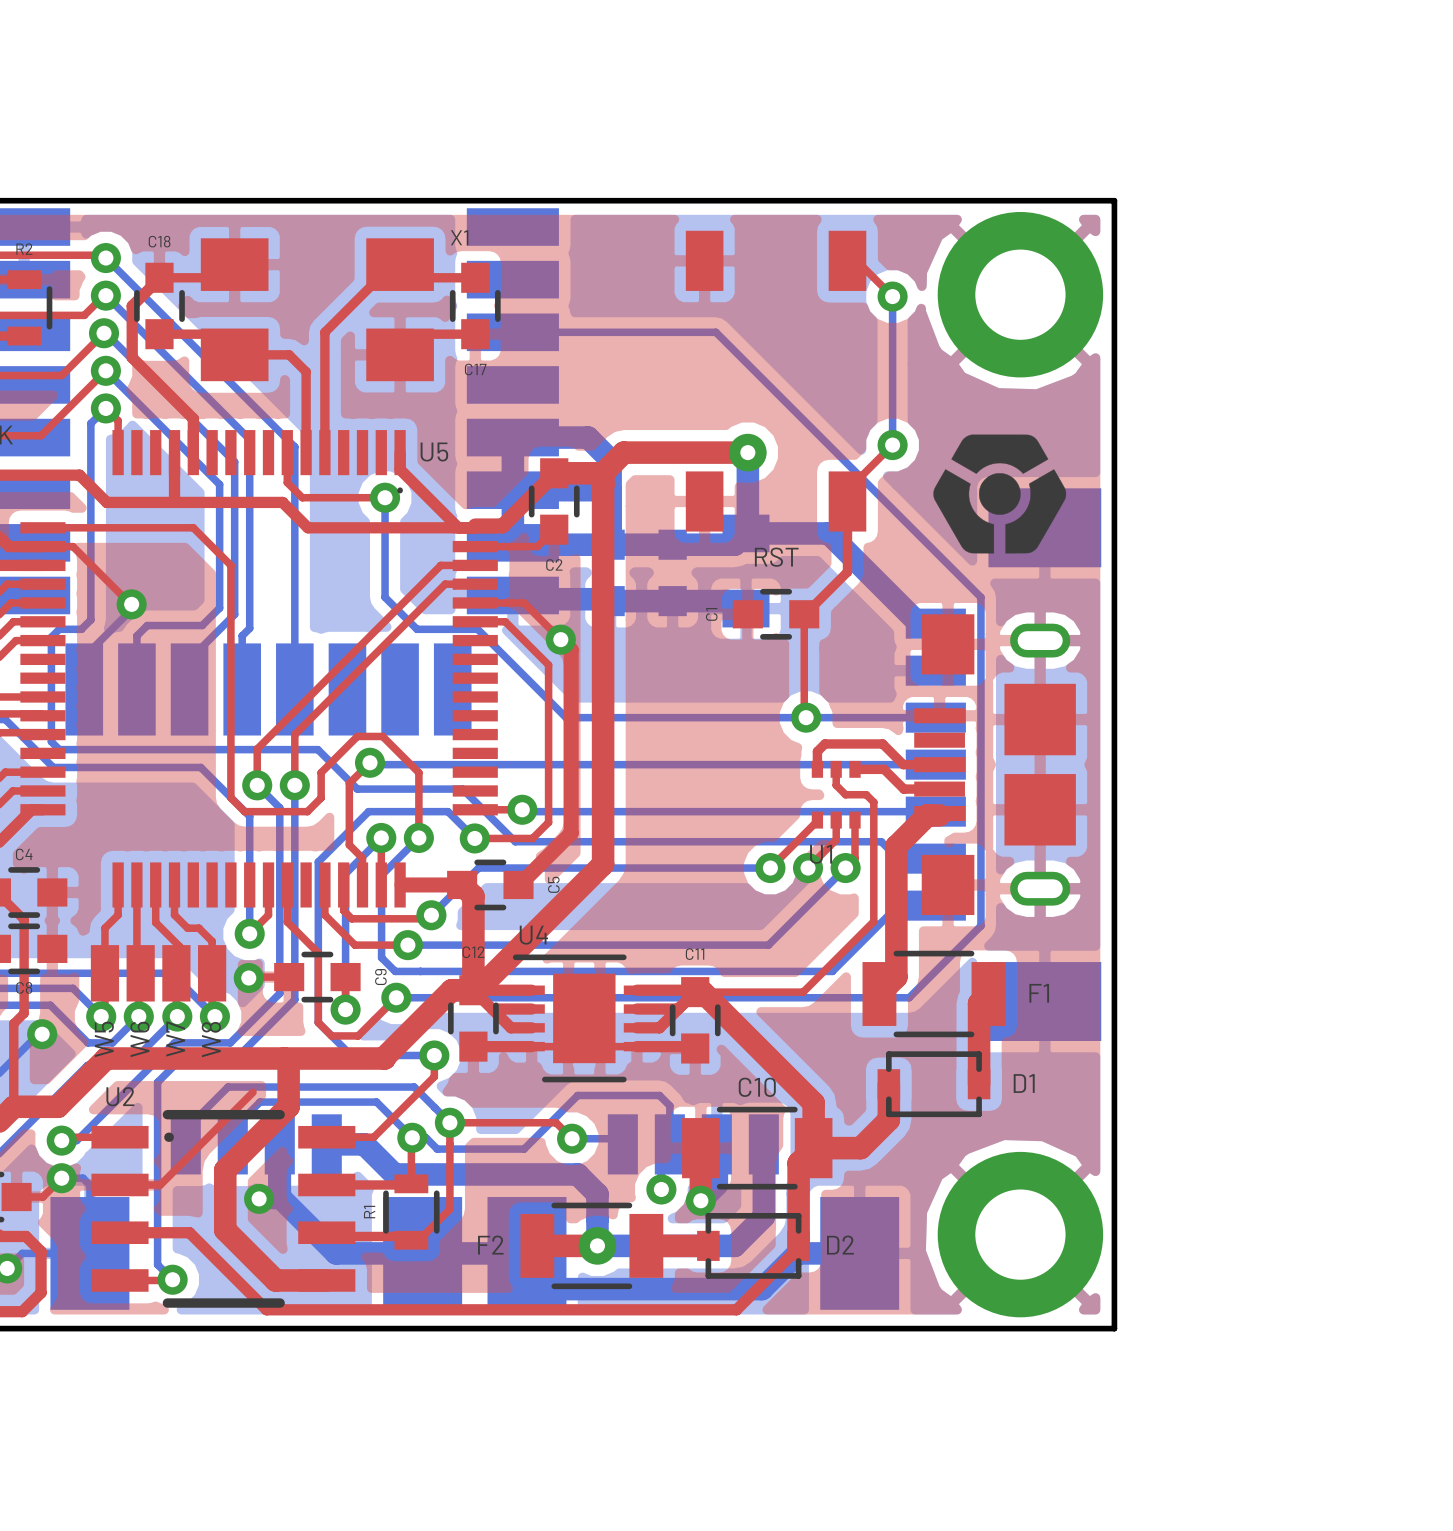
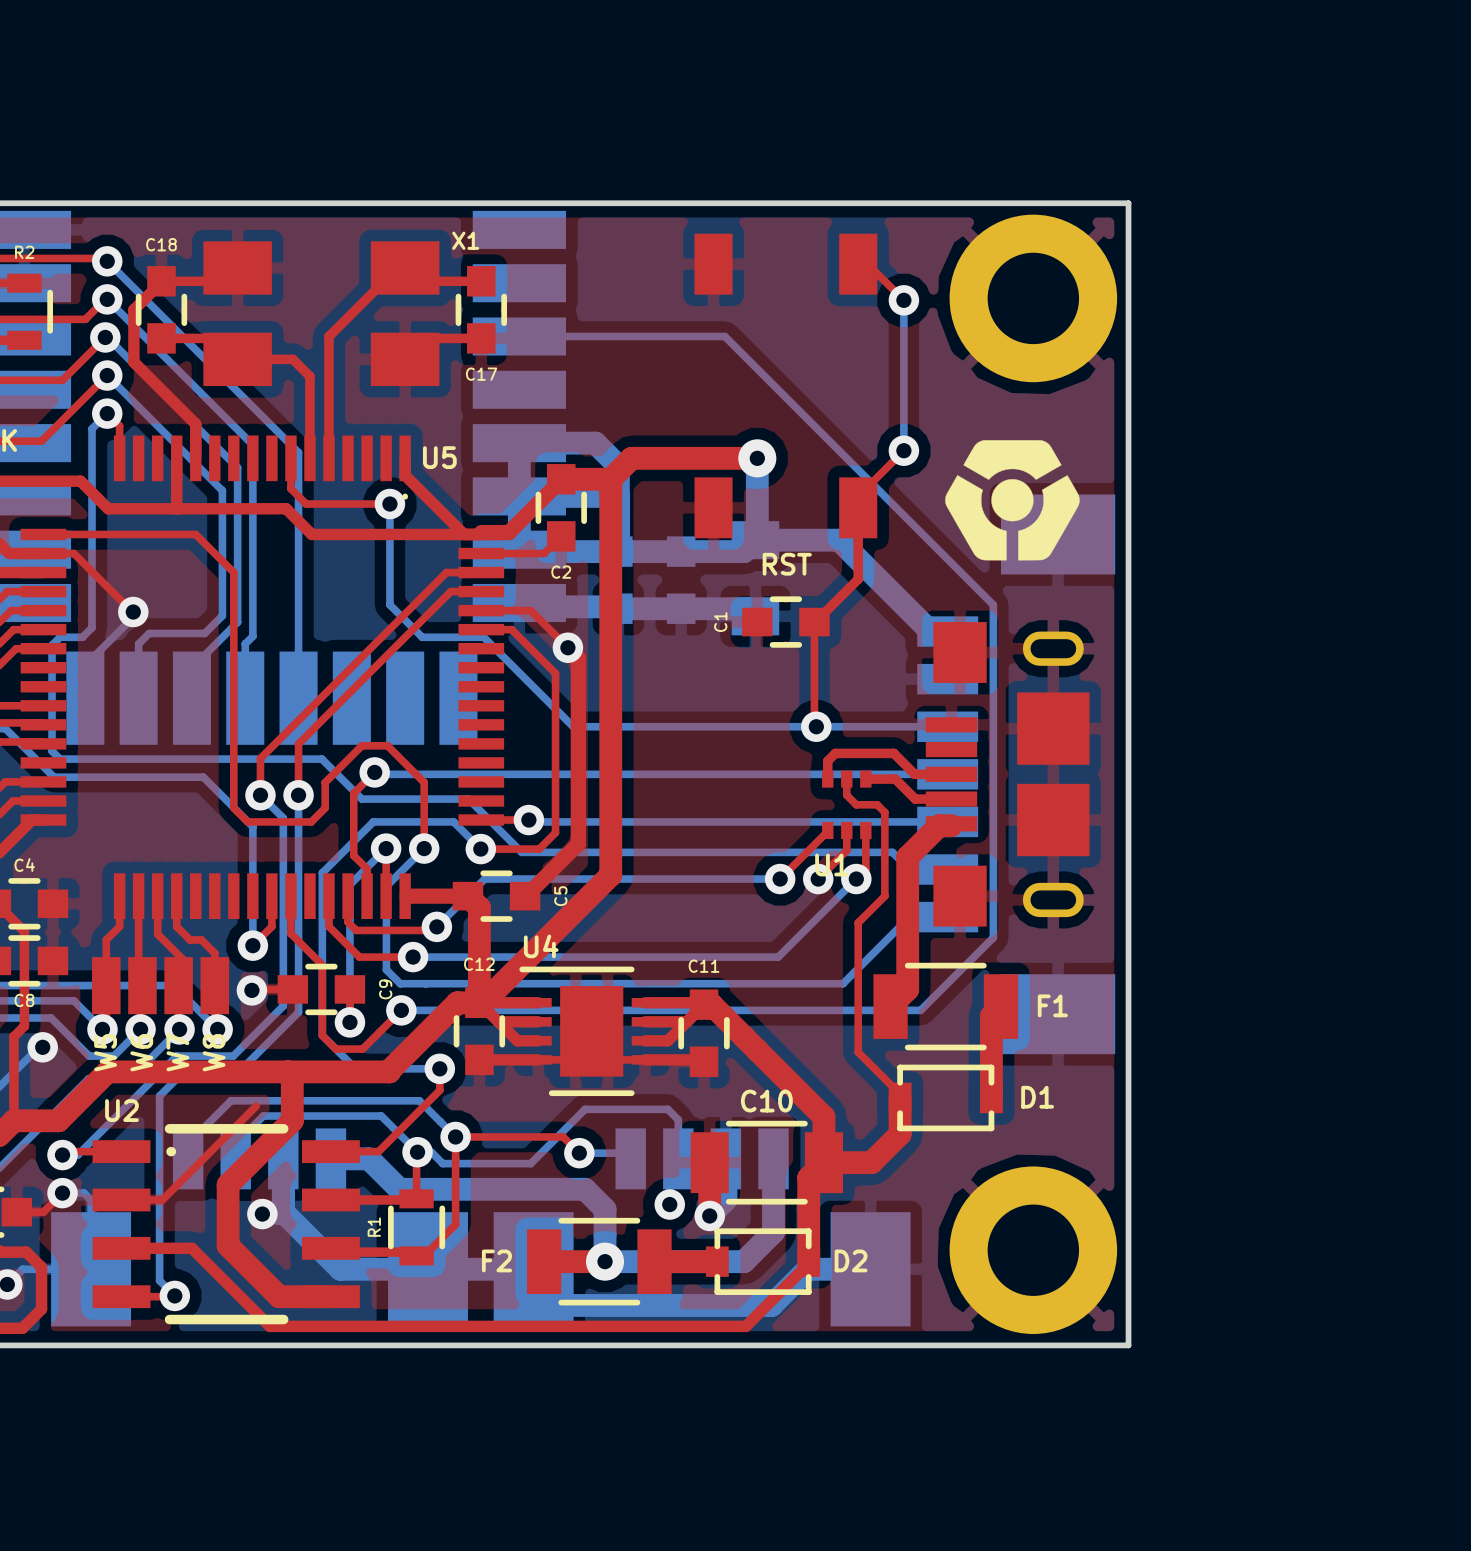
top track: (873, 884) (873, 921) (803, 992) (695, 992) -> (884, 896) (858, 922) (858, 1052) (900, 1094) (900, 1097)

